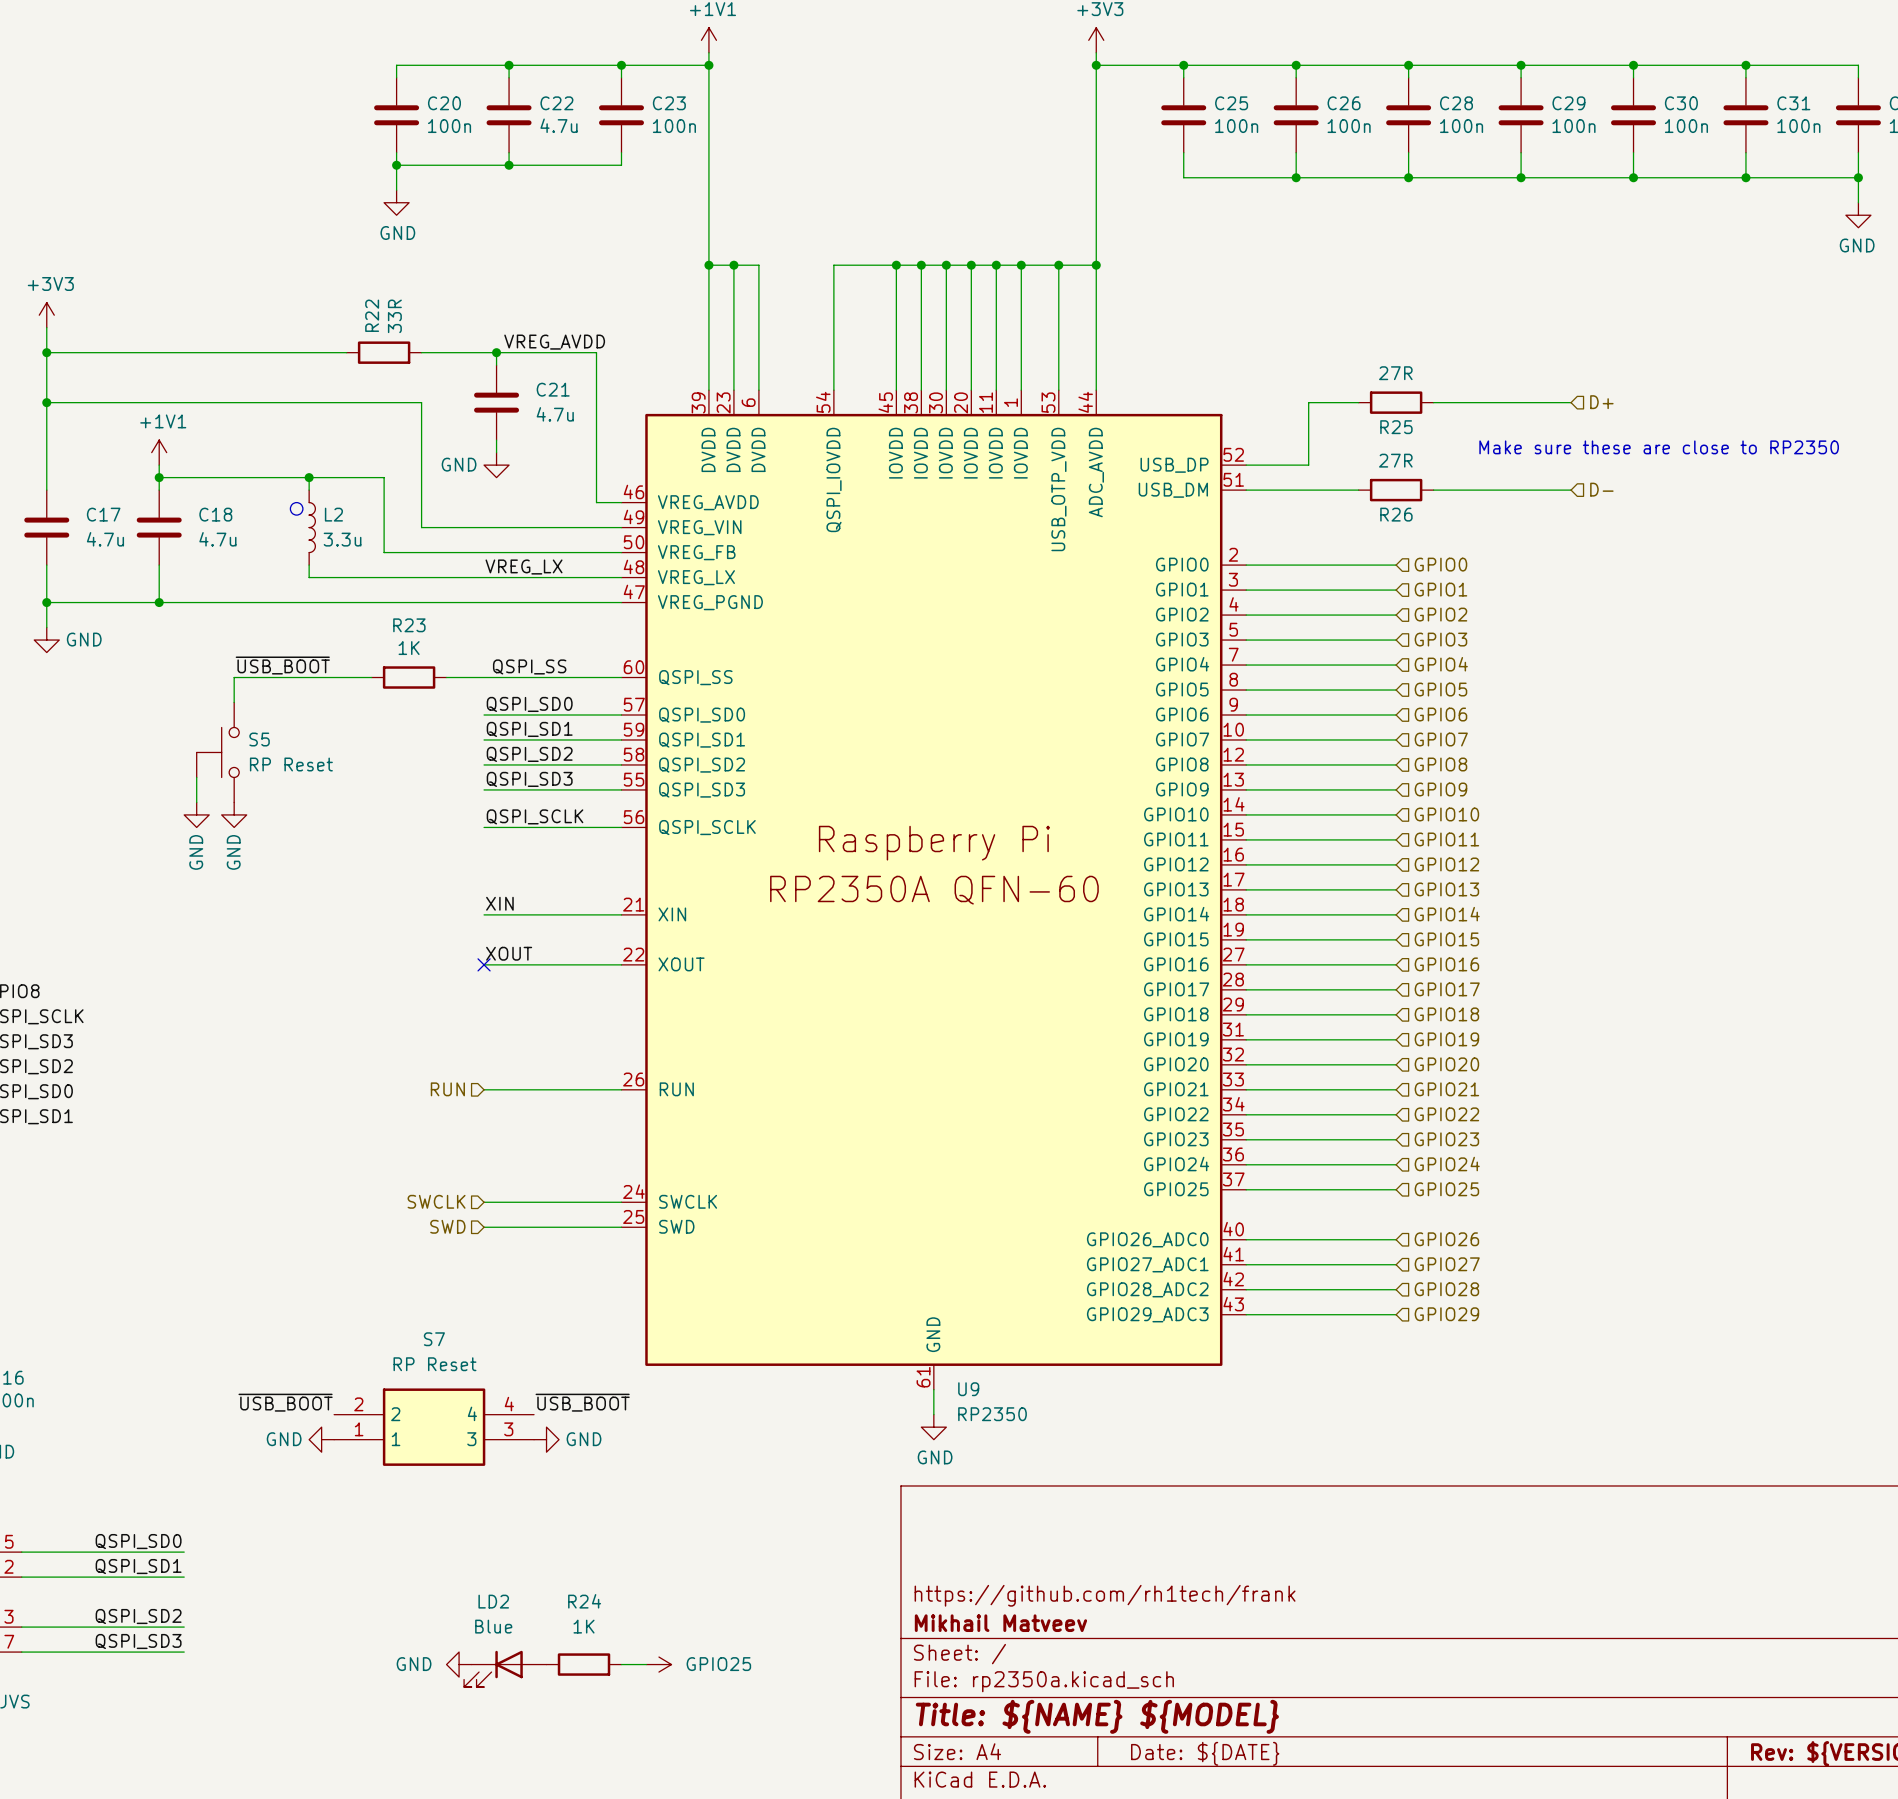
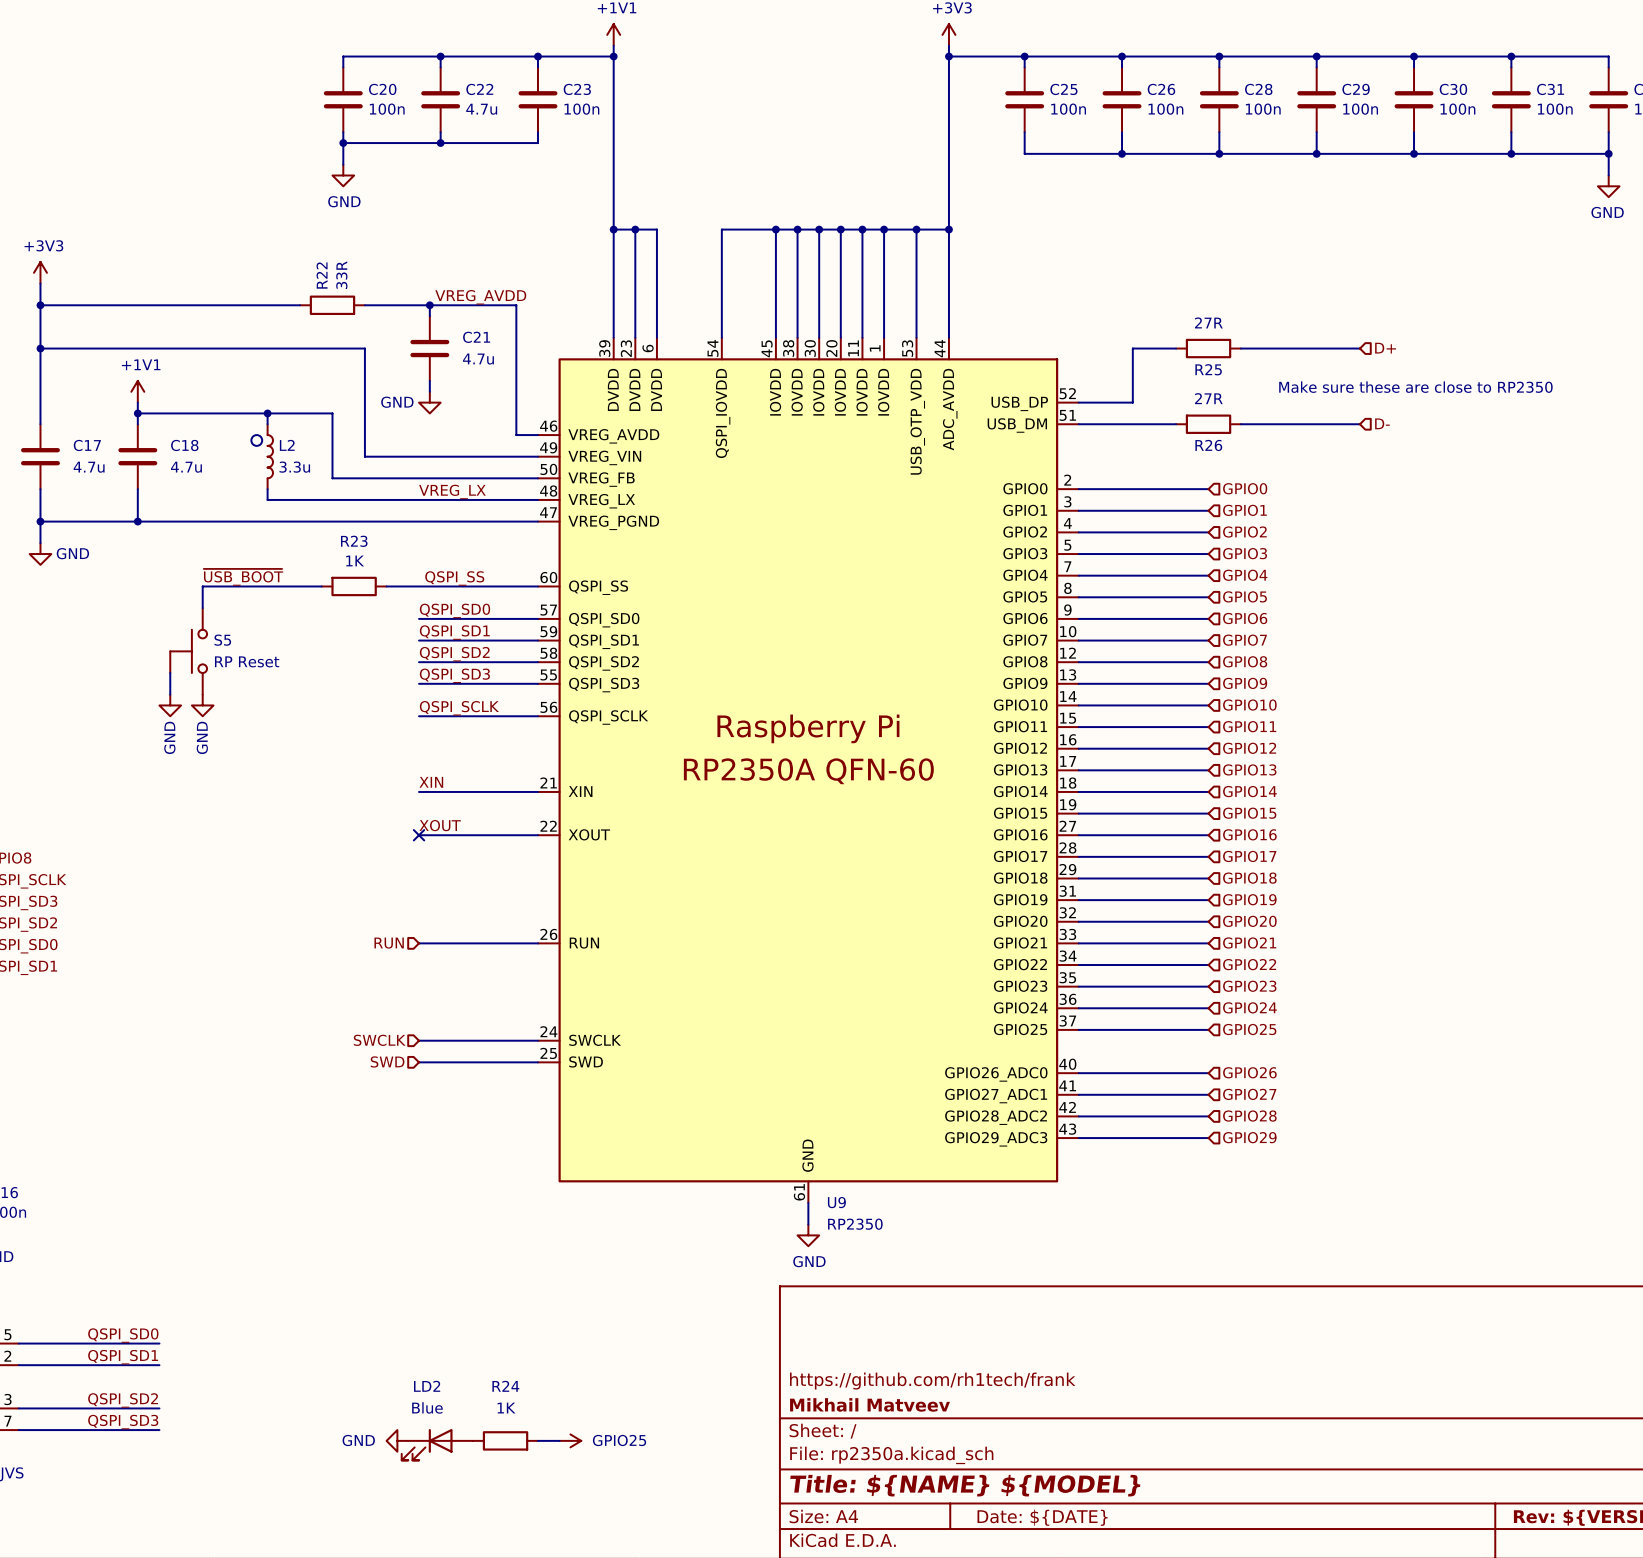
label: ~{USB_BOOT} (285, 1402) -> none
label: ~{USB_BOOT} (582, 1402) -> none
S7: RP Reset (434, 1427) -> none
power symbol: GND (321, 1439) -> none
power symbol: GND (546, 1439) -> none

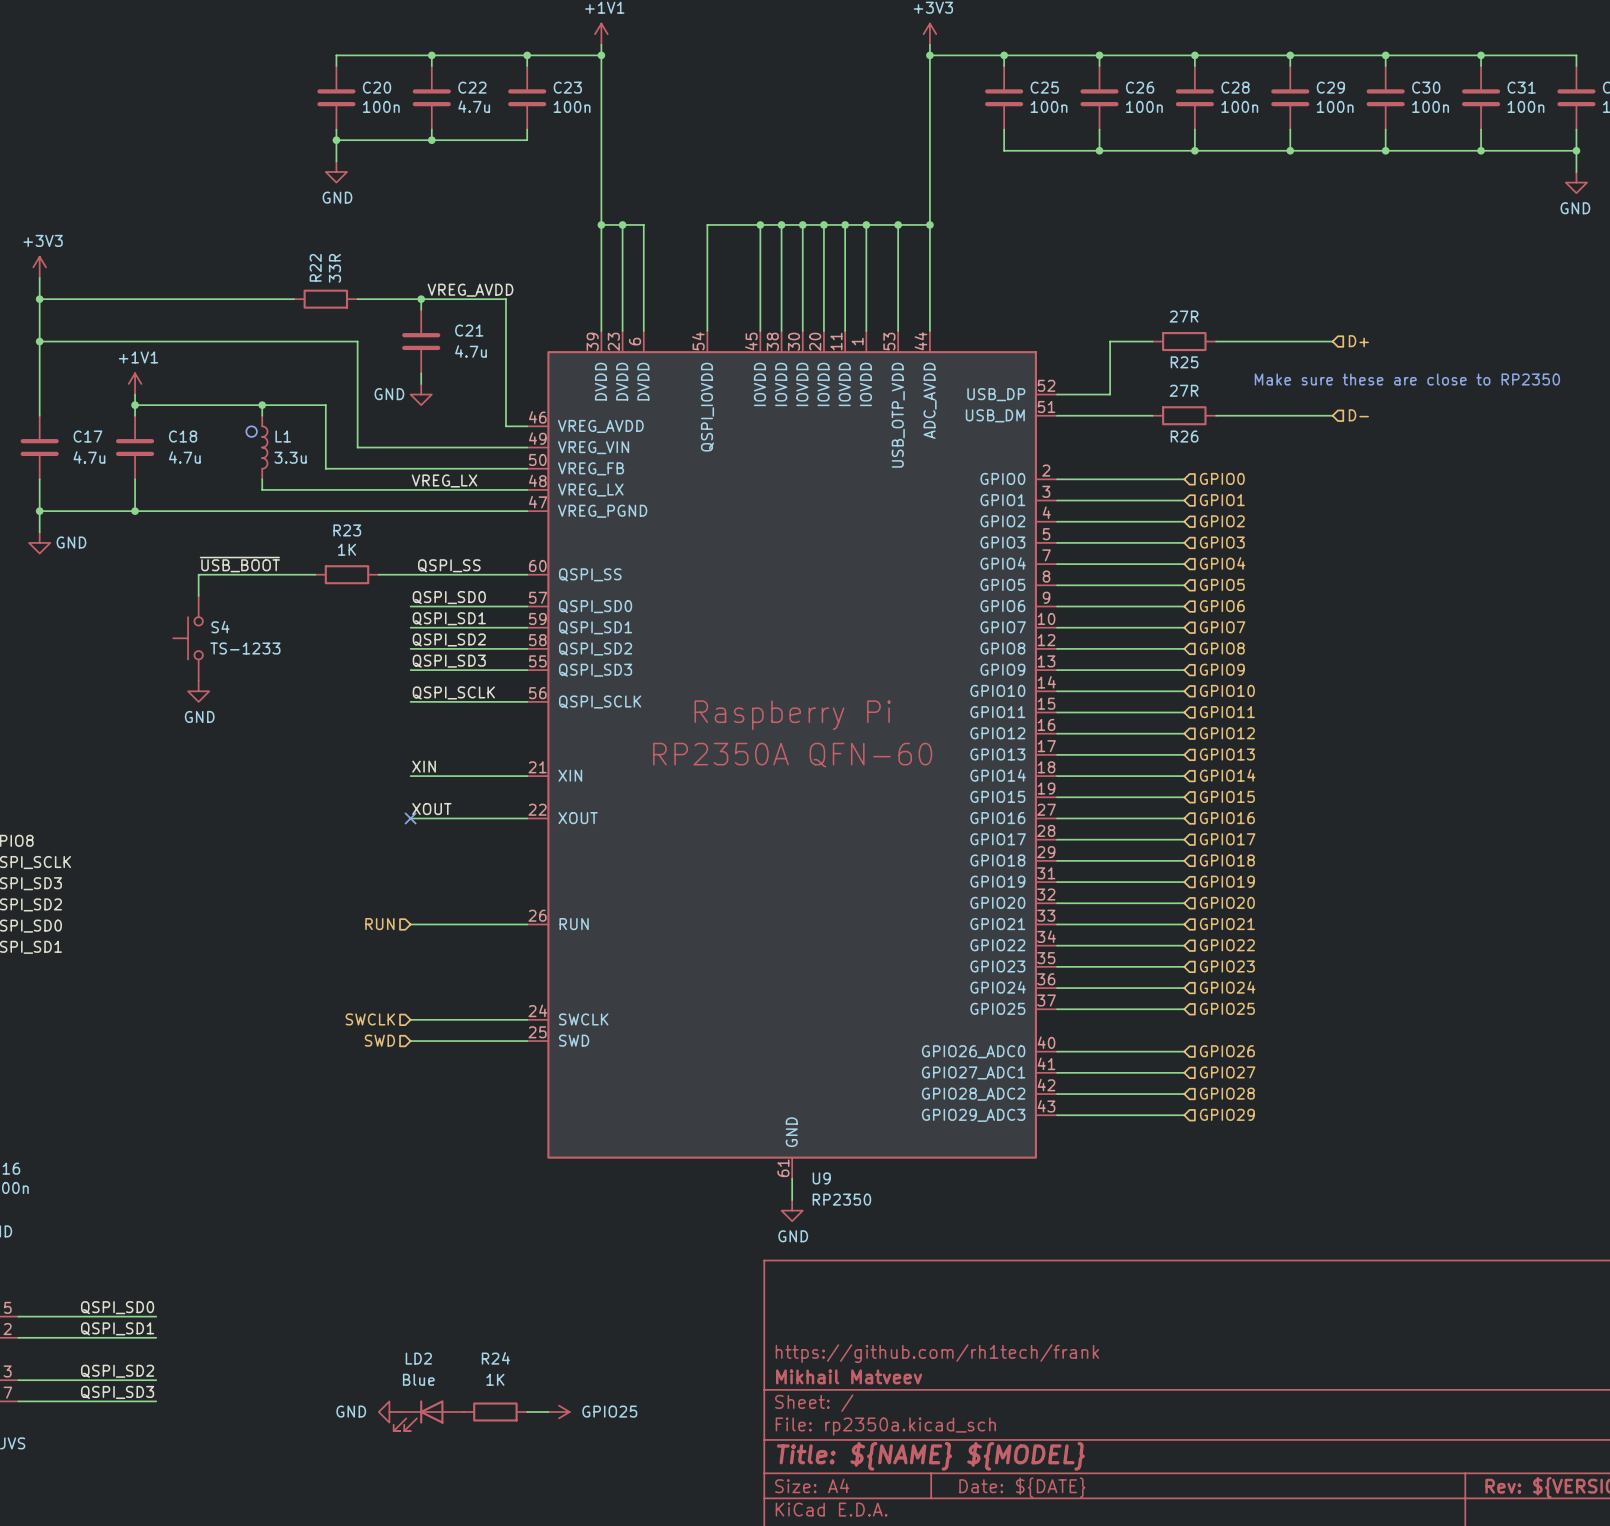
L2 name: L2 (287, 445) -> L1 (283, 436)
S5: RP Reset (188, 651) -> none
S4: none -> TS-1233 (188, 638)
wire: (170, 673) (170, 694) -> none
power symbol: GND (170, 705) -> none
power symbol text rotation: 0° (202, 737) -> 90° clockwise (199, 716)

